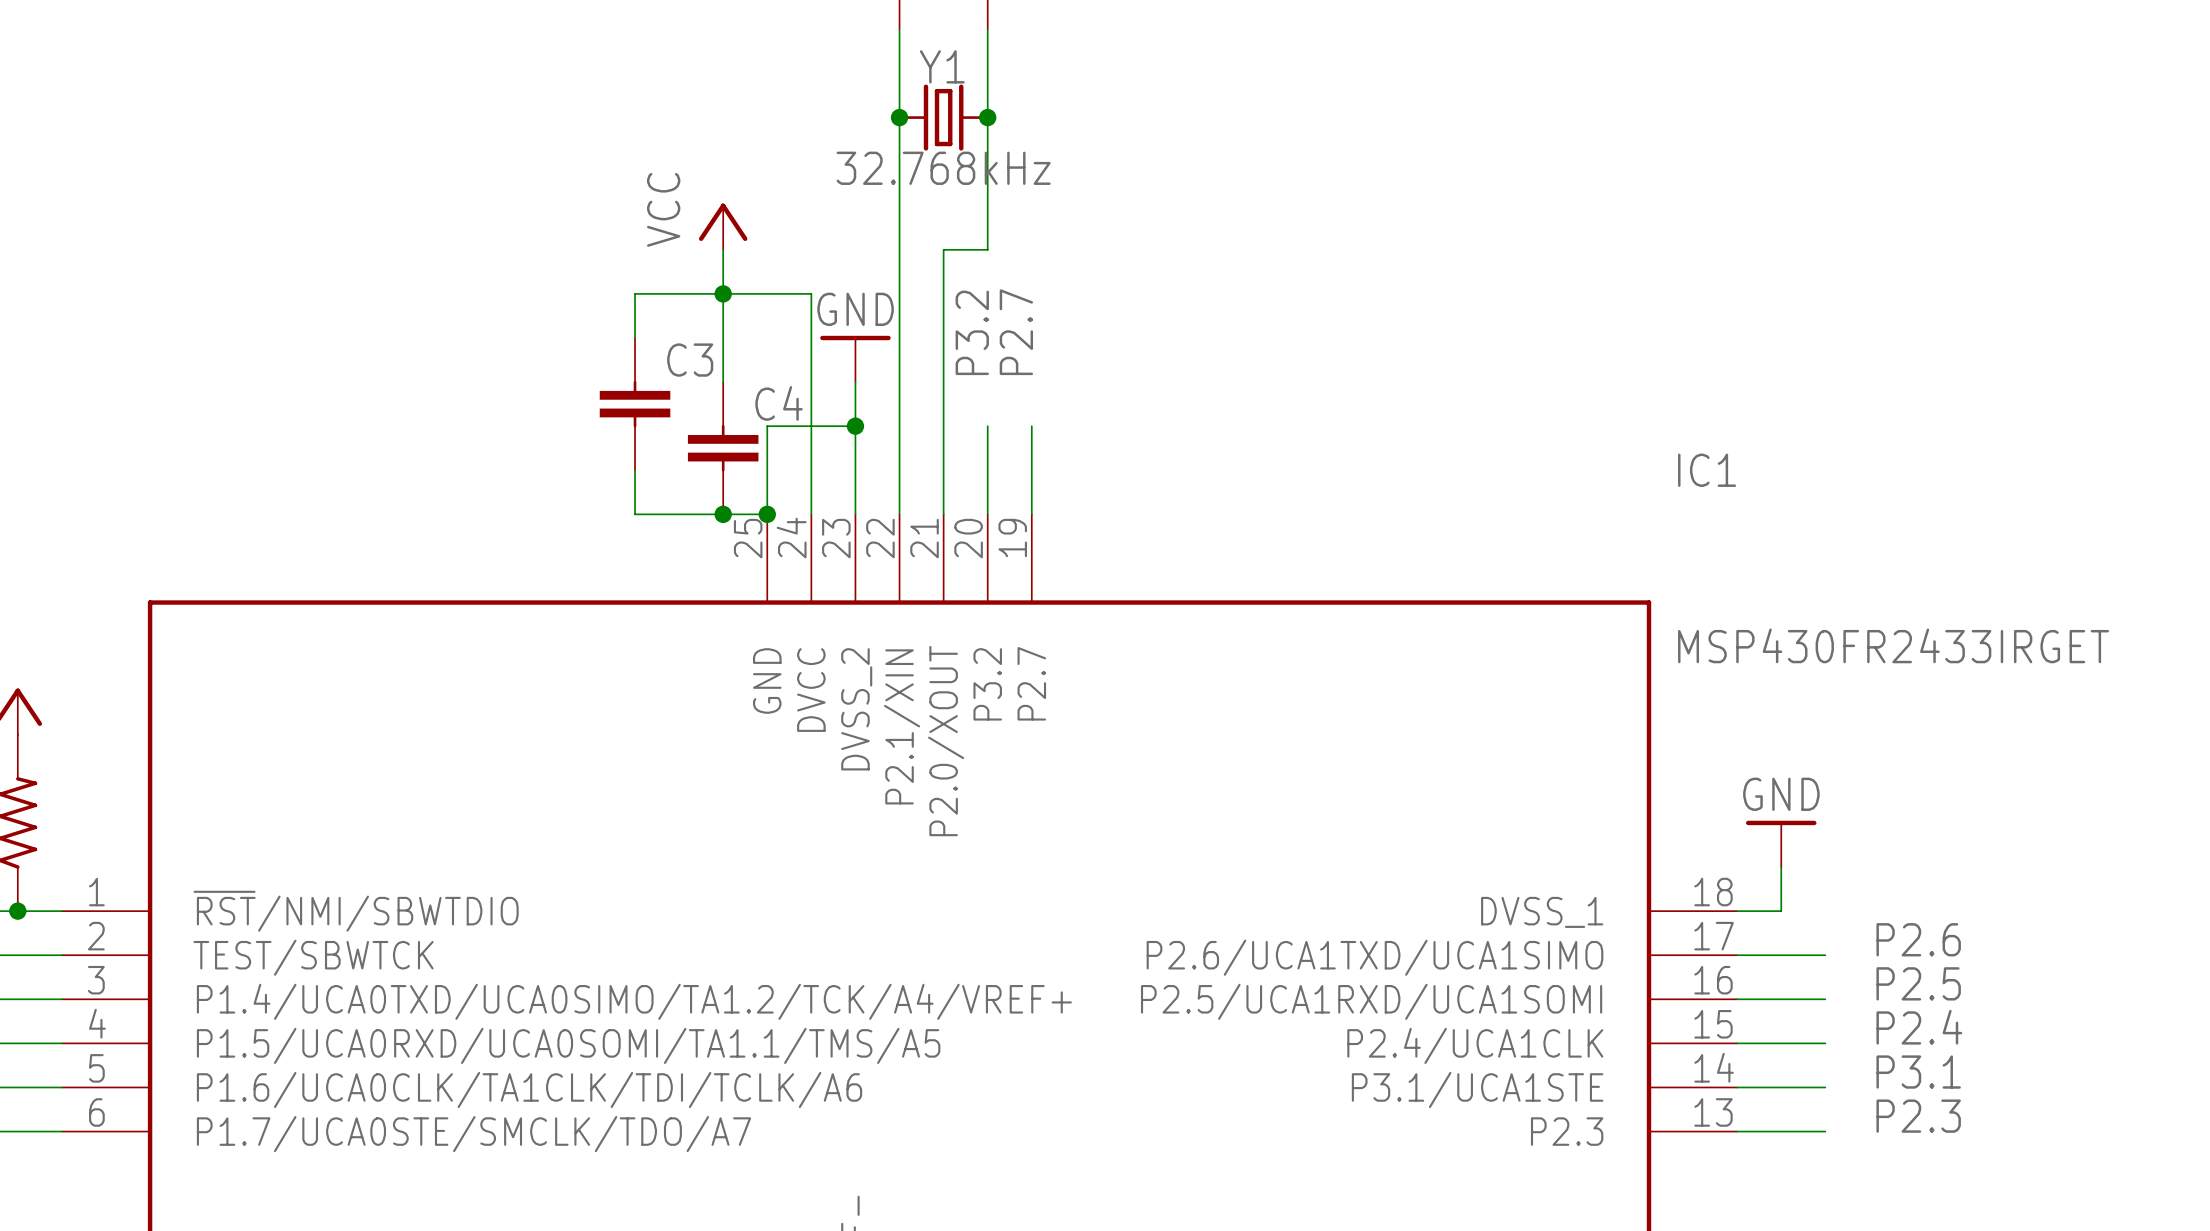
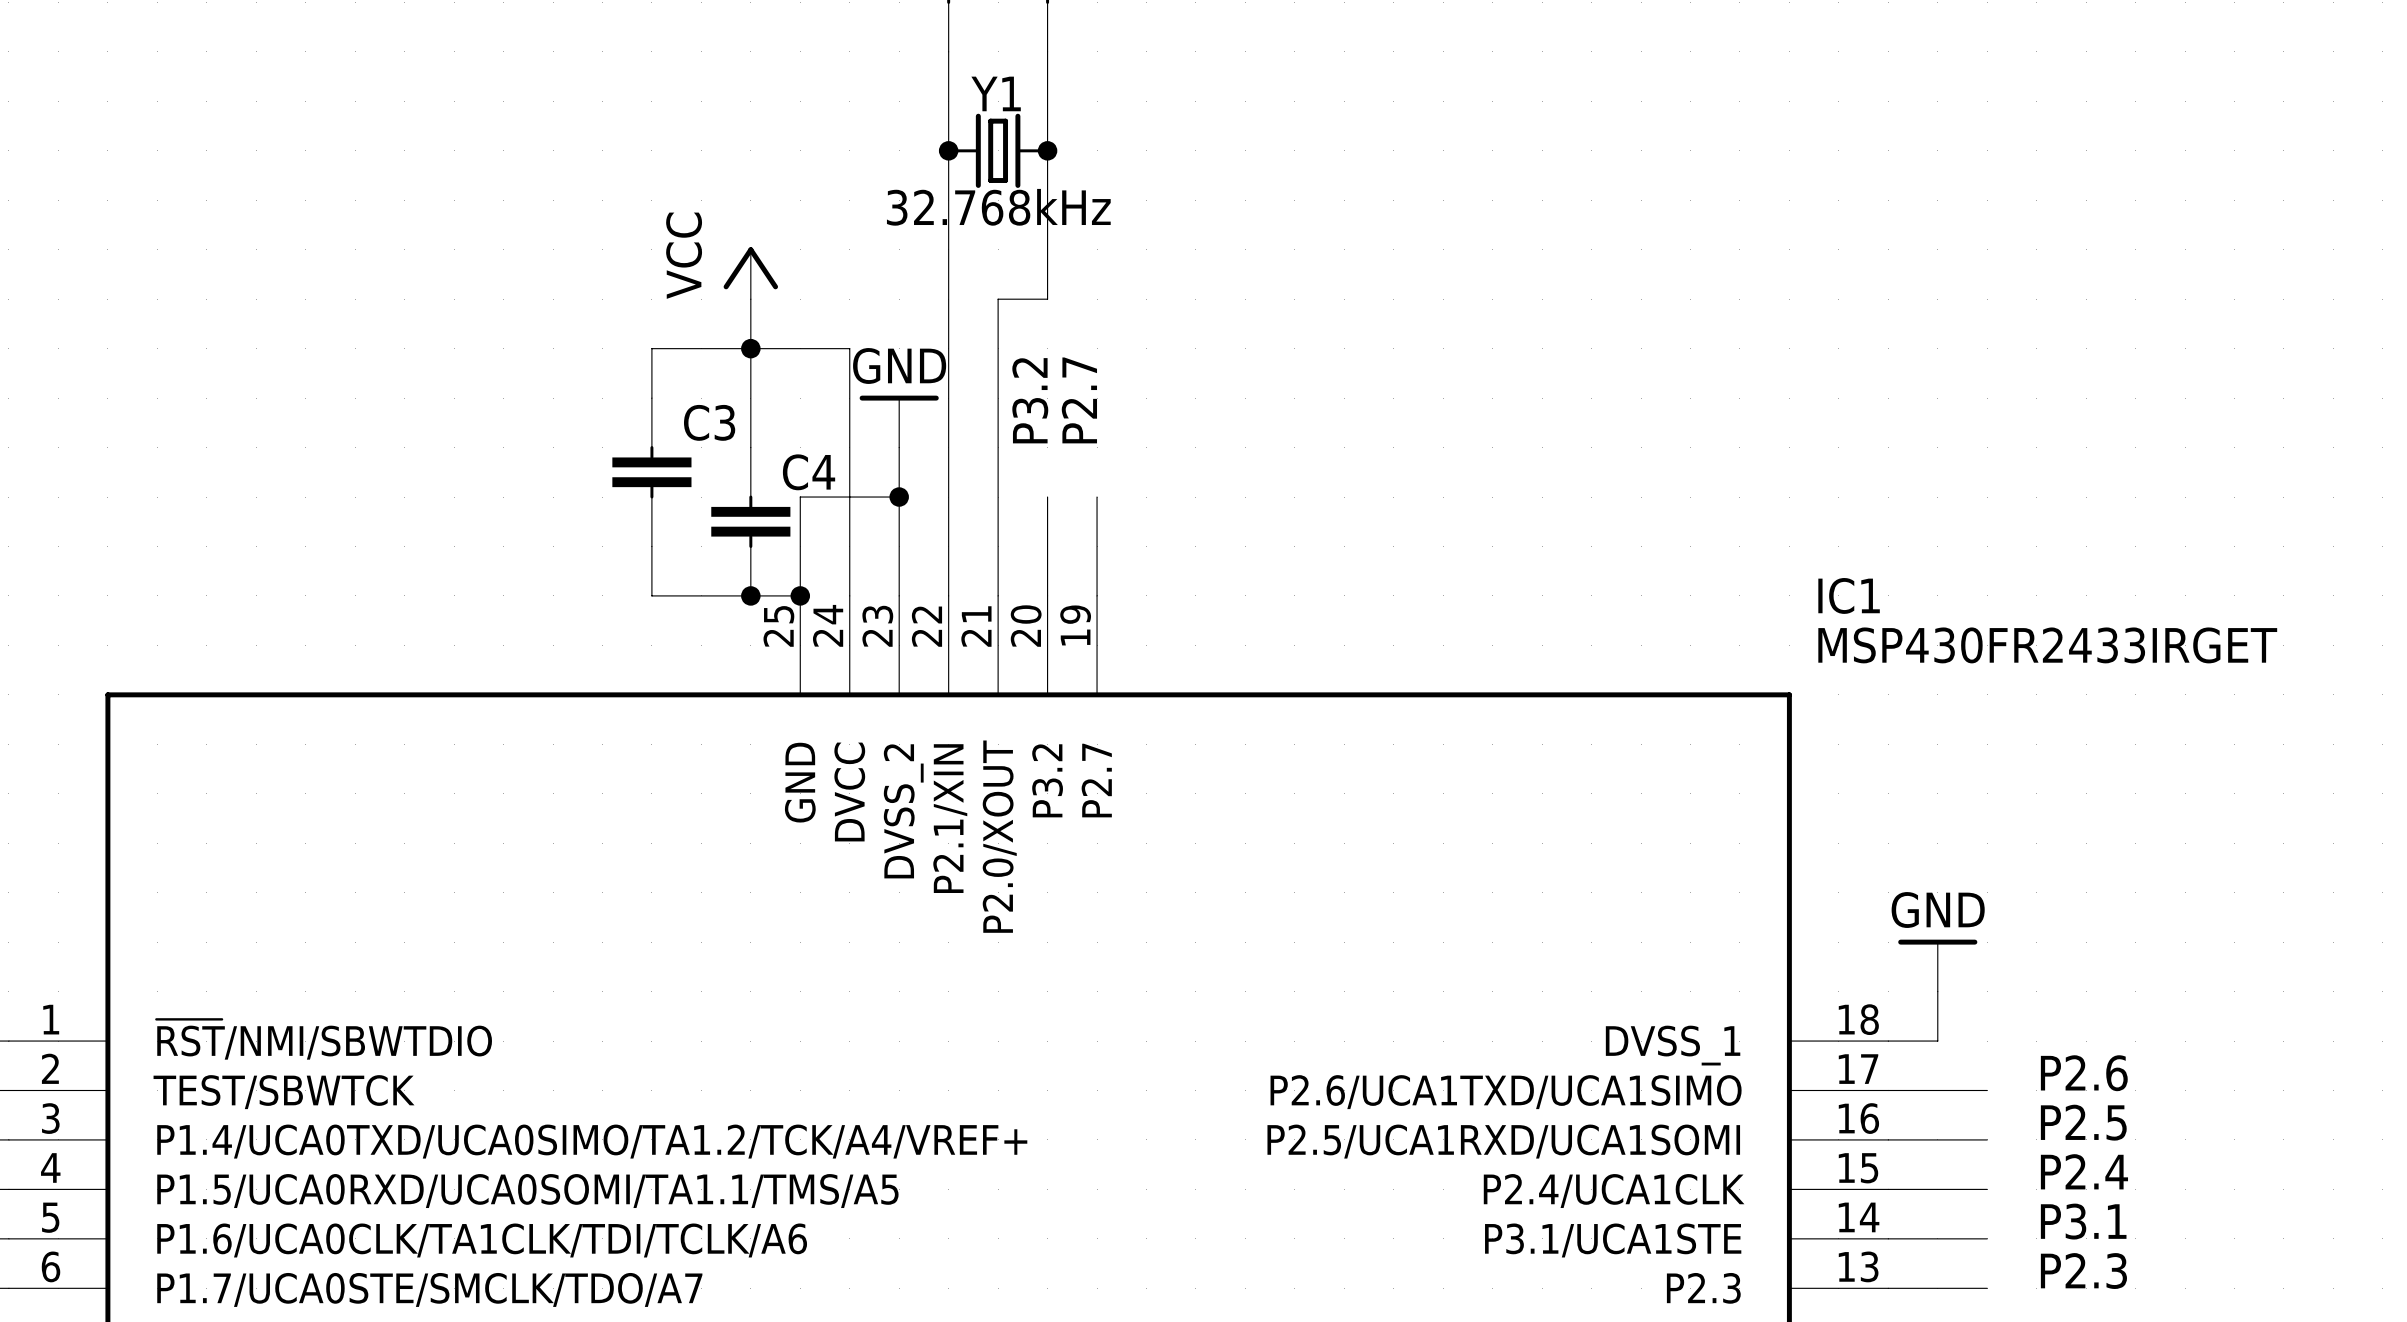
IC1 name position: IC1 (1707, 470) -> IC1 (1849, 595)
IC1 value position: MSP430FR2433IRGET (1893, 645) -> MSP430FR2433IRGET (2047, 645)

